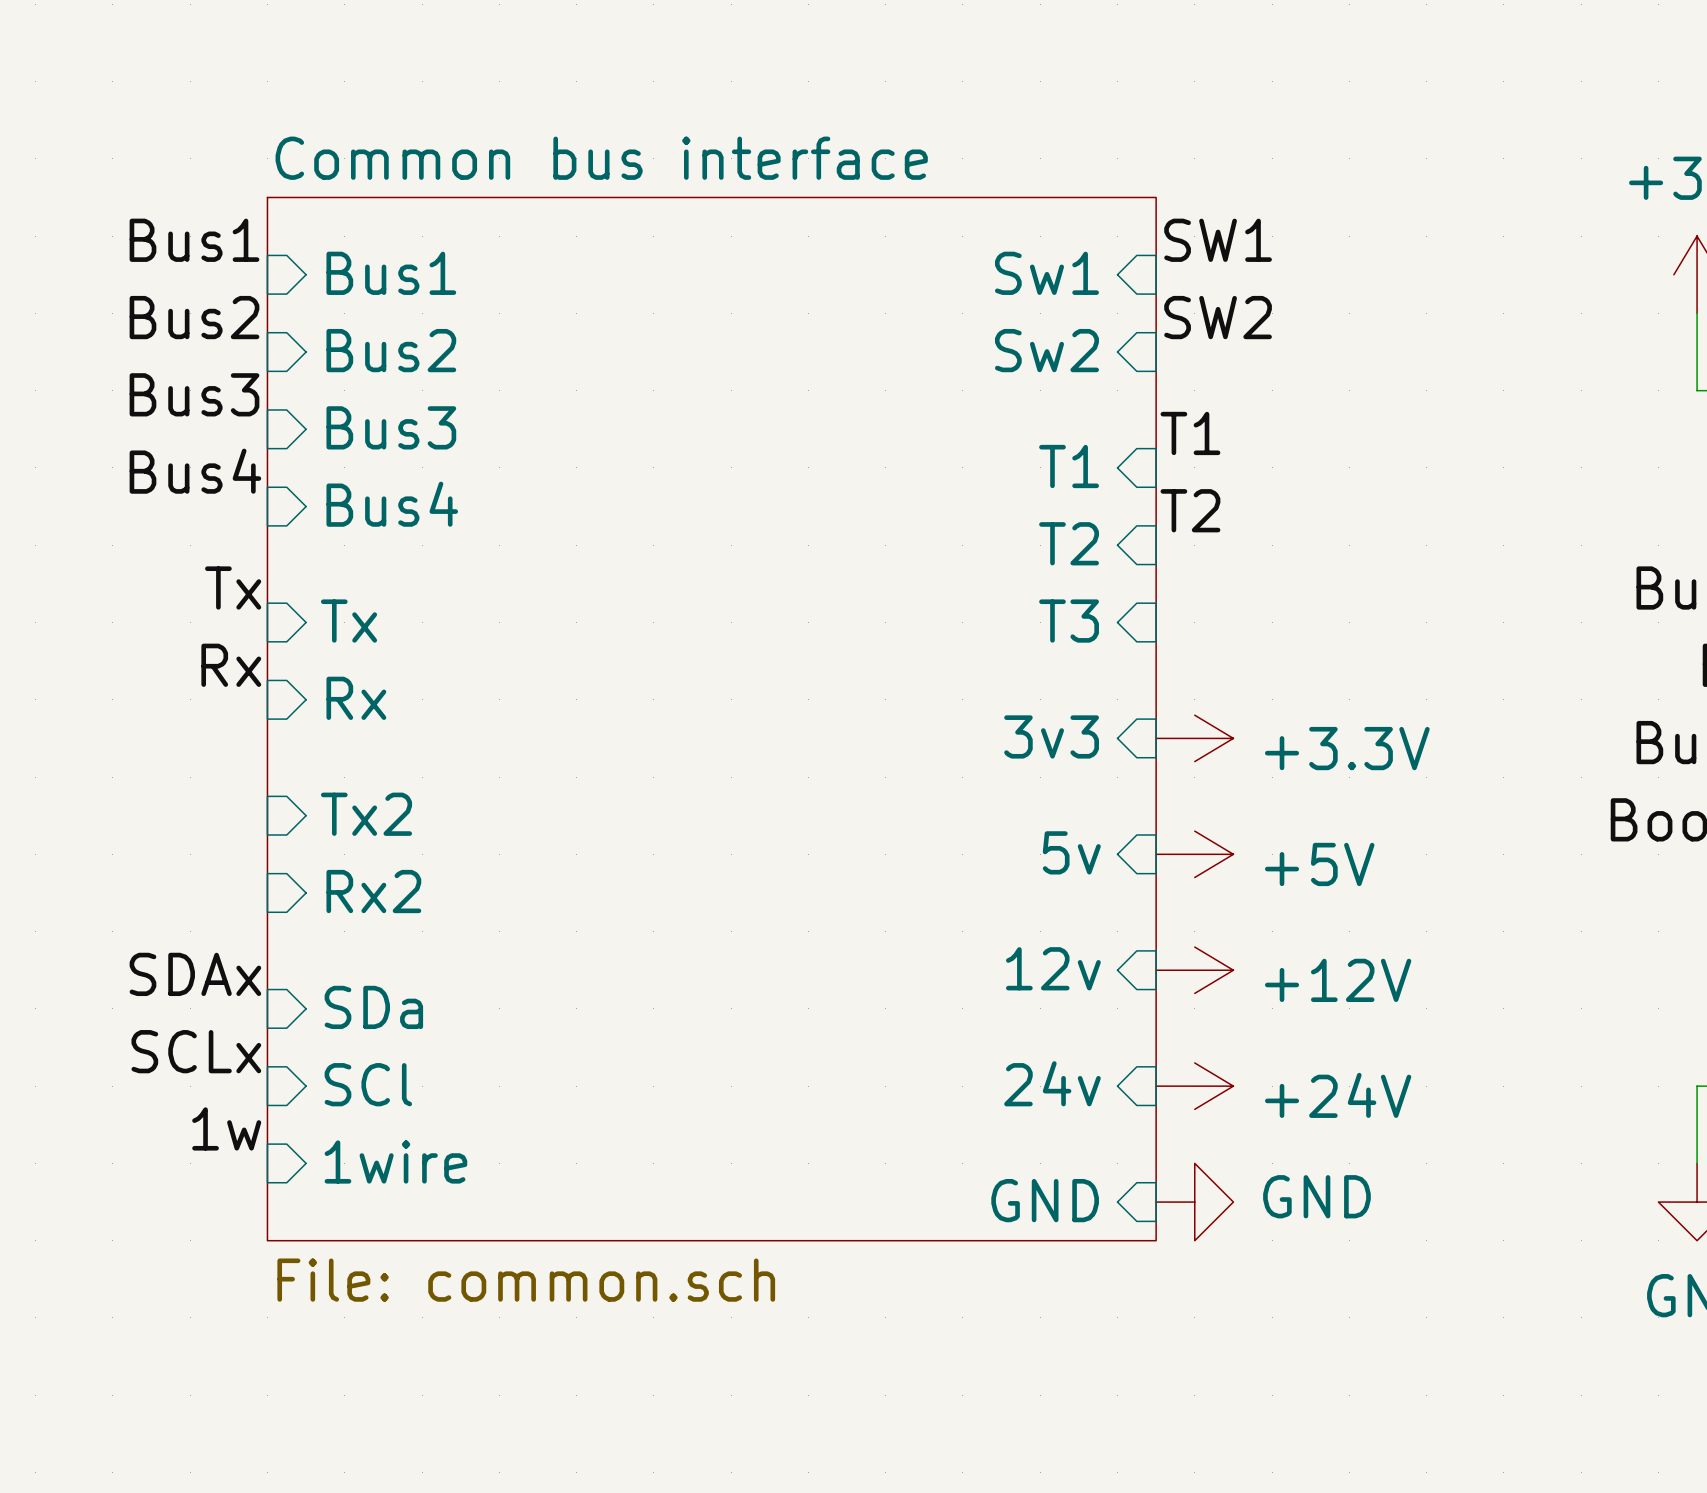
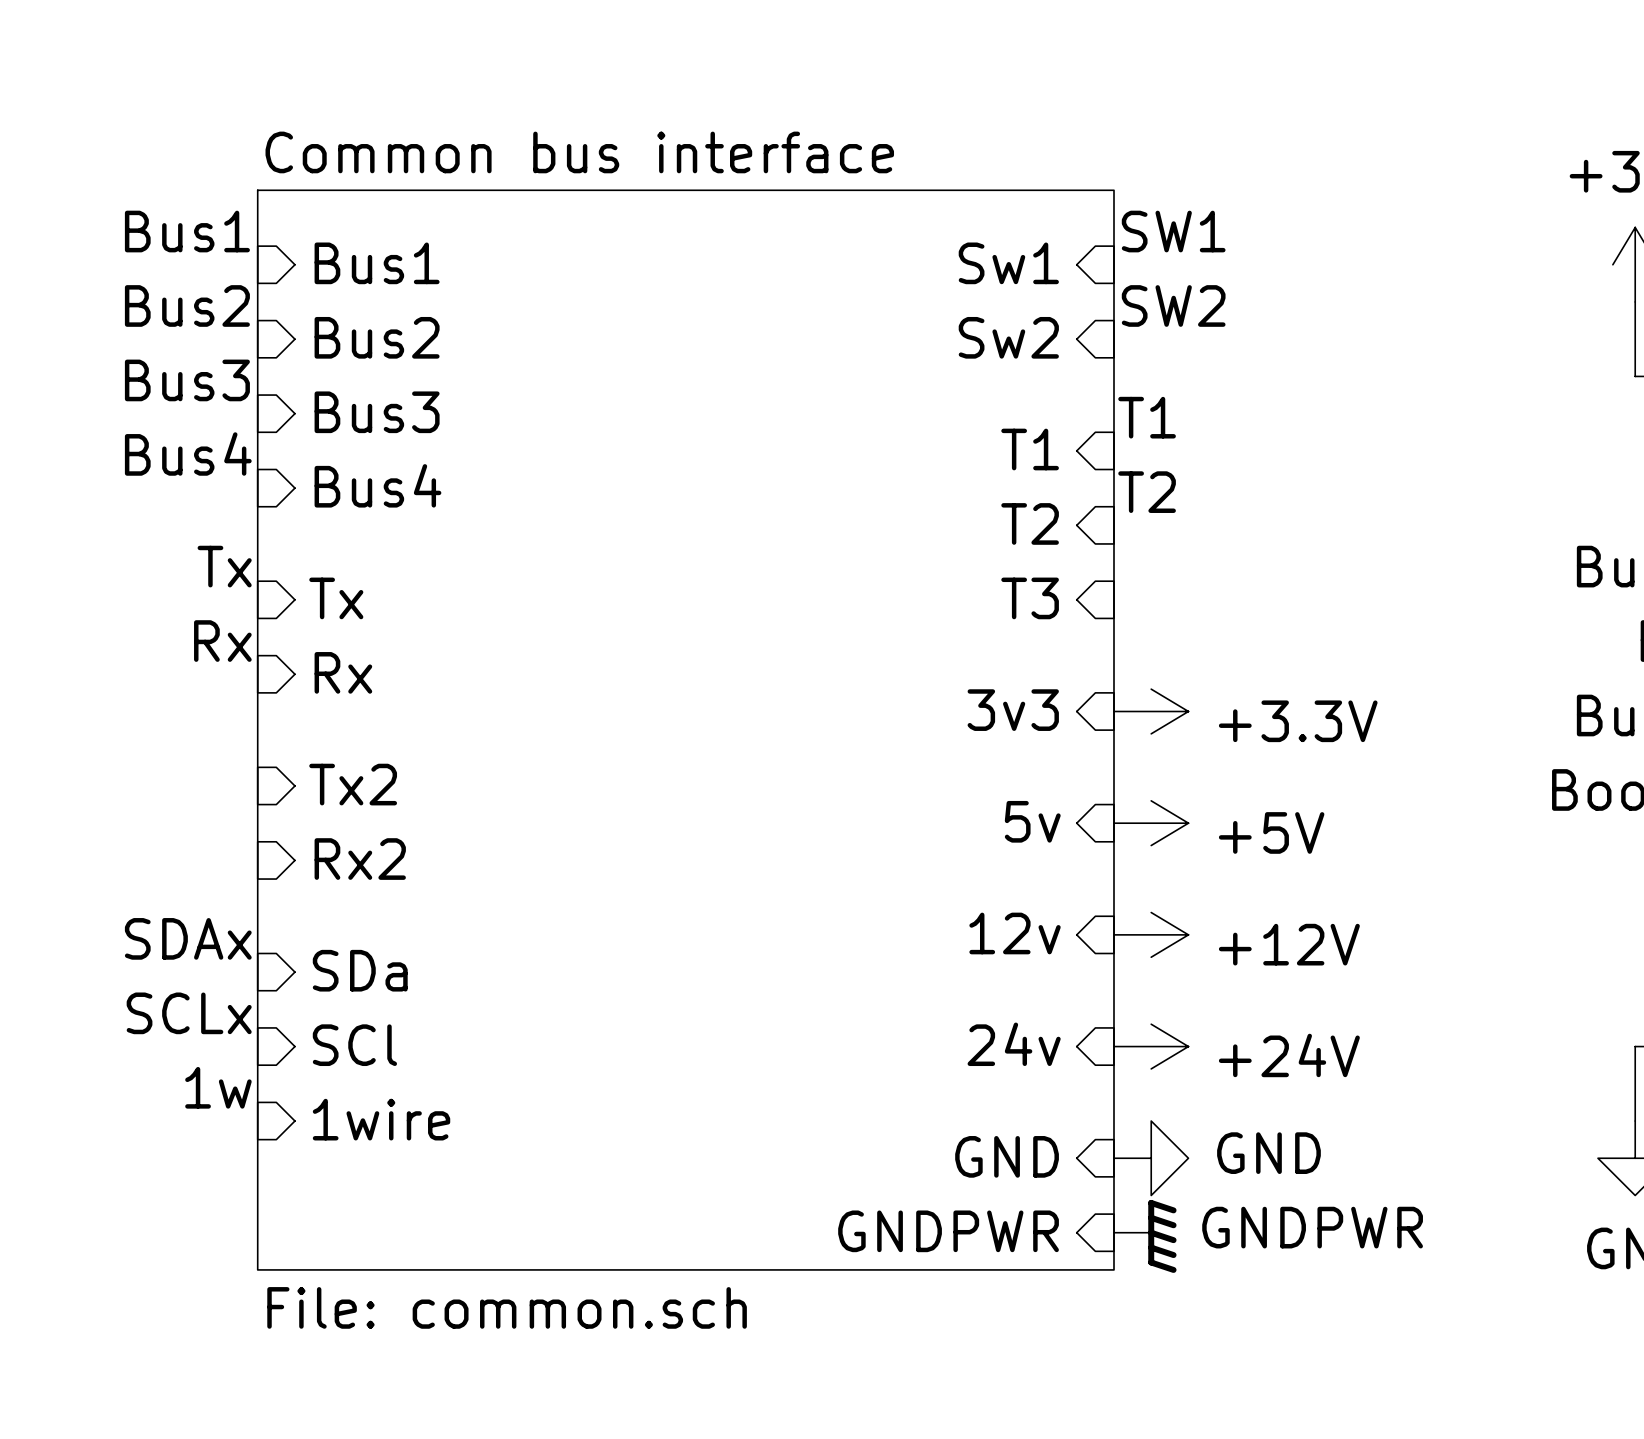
sheet Common bus interface: File: common.sch (711, 719) -> none
sheet Common bus interface: none -> File: common.sch (685, 730)
sheet pin: none -> GNDPWR (948, 1231)
power symbol: none -> GNDPWR (1145, 1236)

